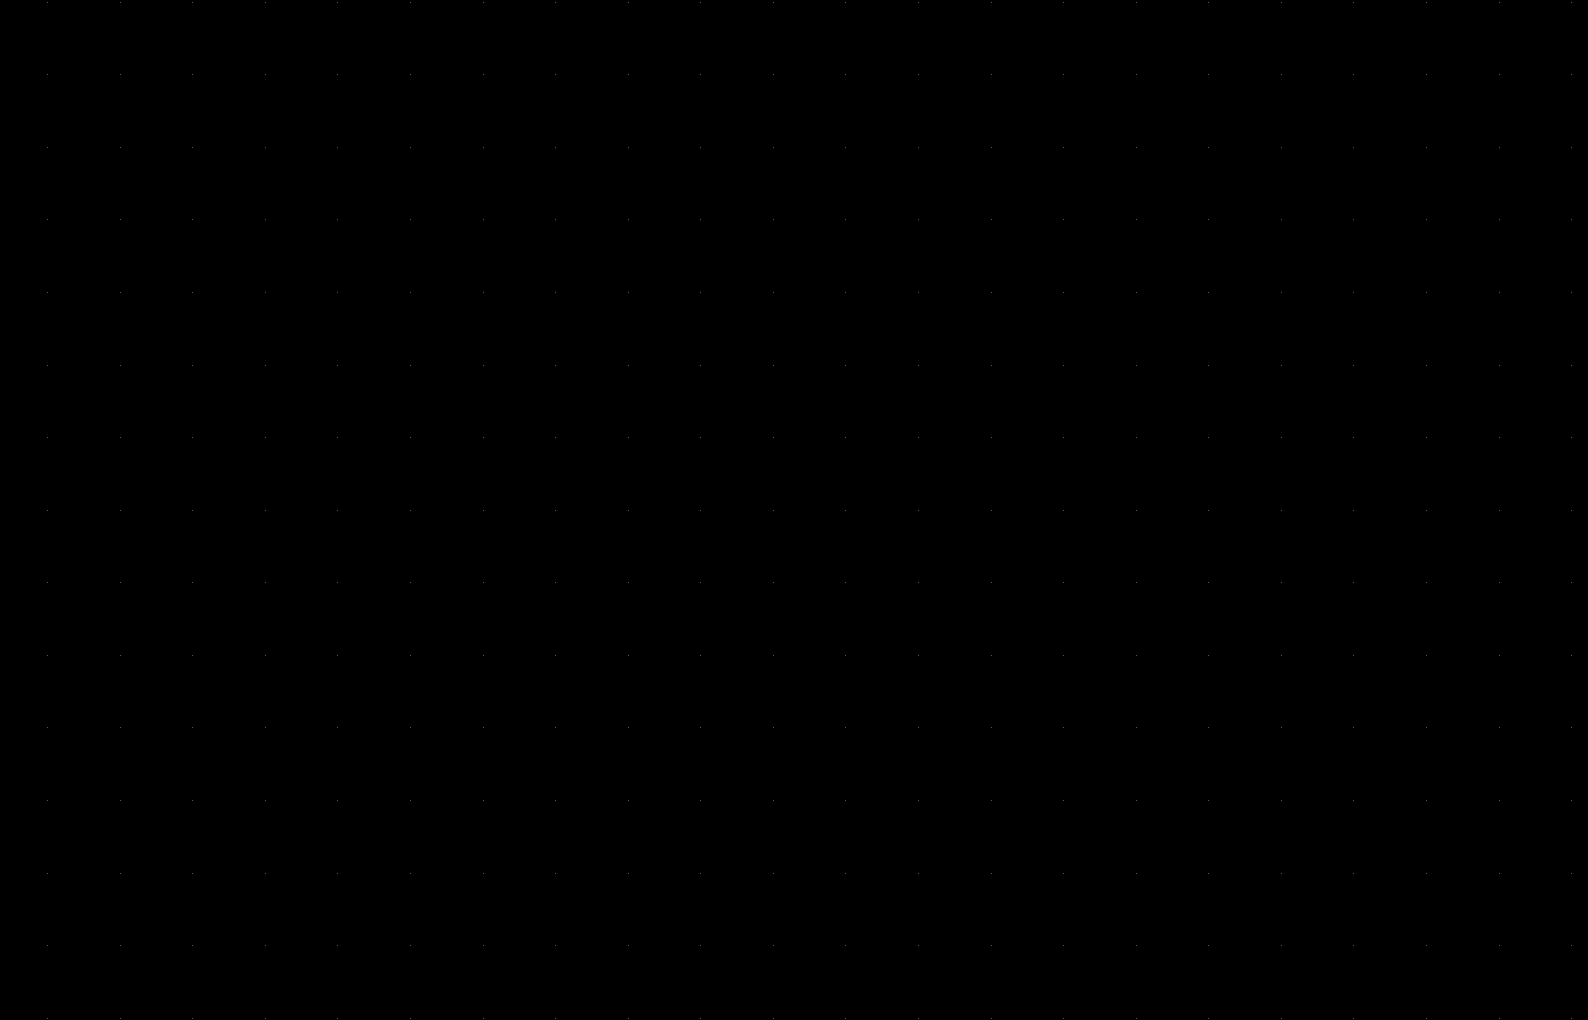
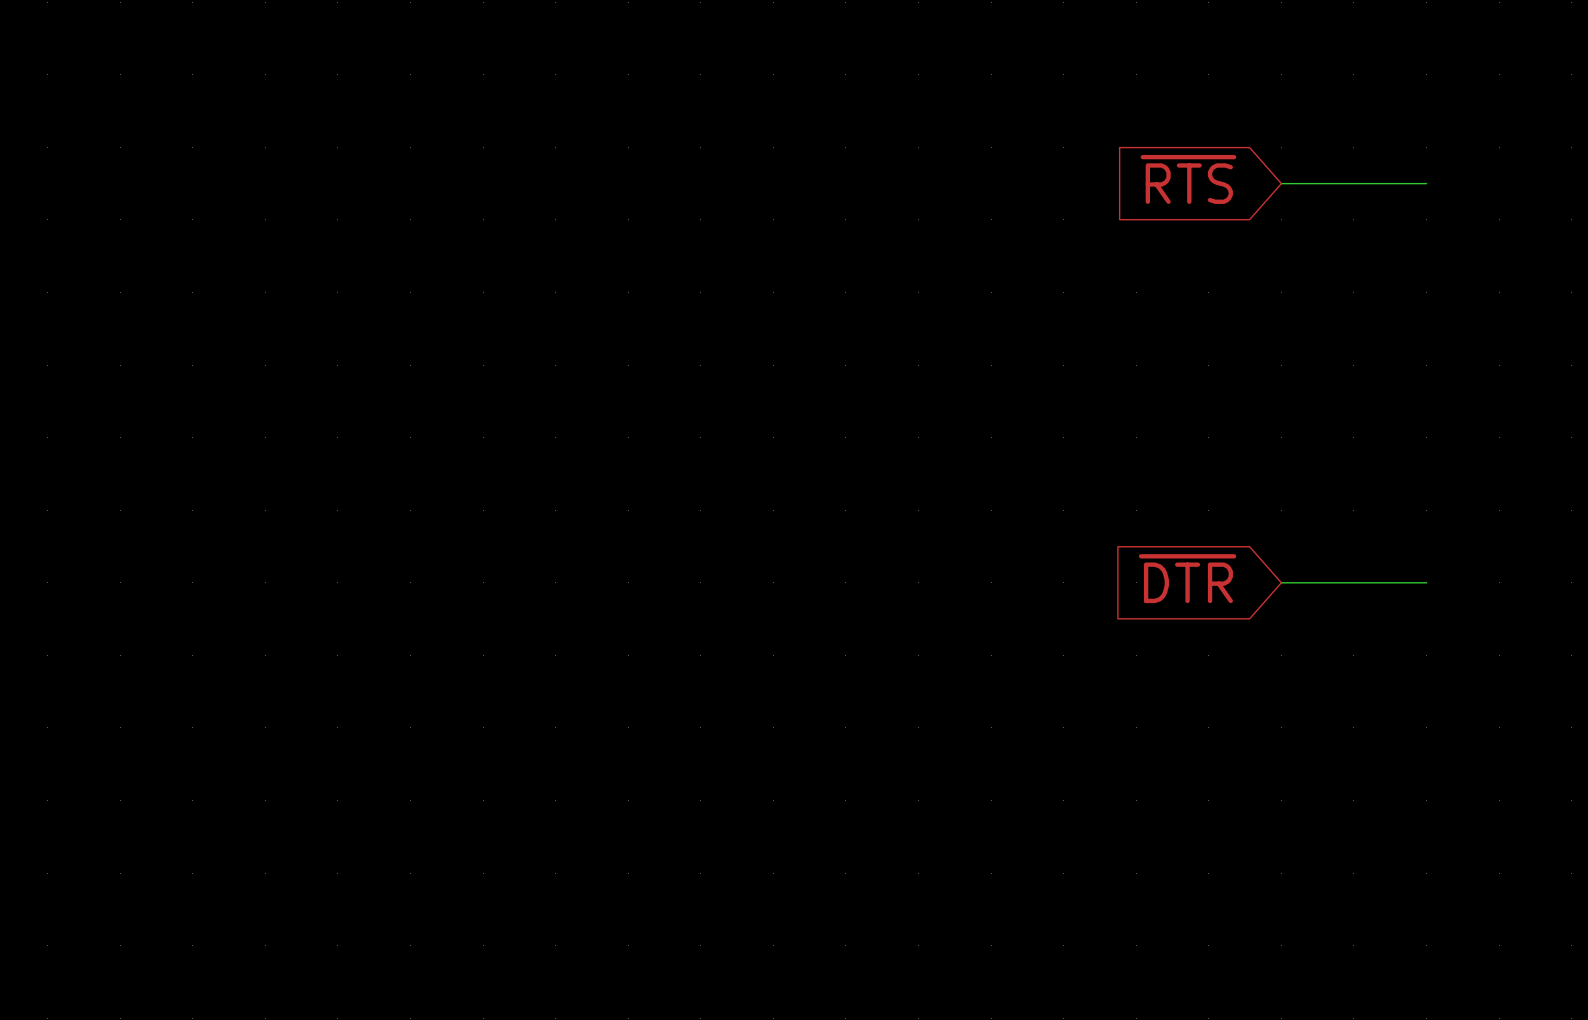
global label: none -> ~{RTS} (1188, 179)
wire: none -> (1281, 183) (1426, 183)
global label: none -> ~{DTR} (1187, 578)
wire: none -> (1281, 582) (1426, 582)

